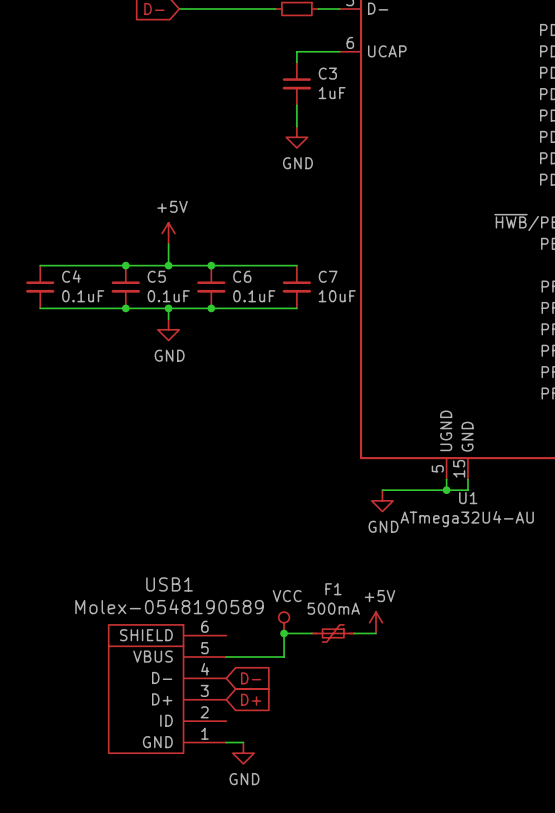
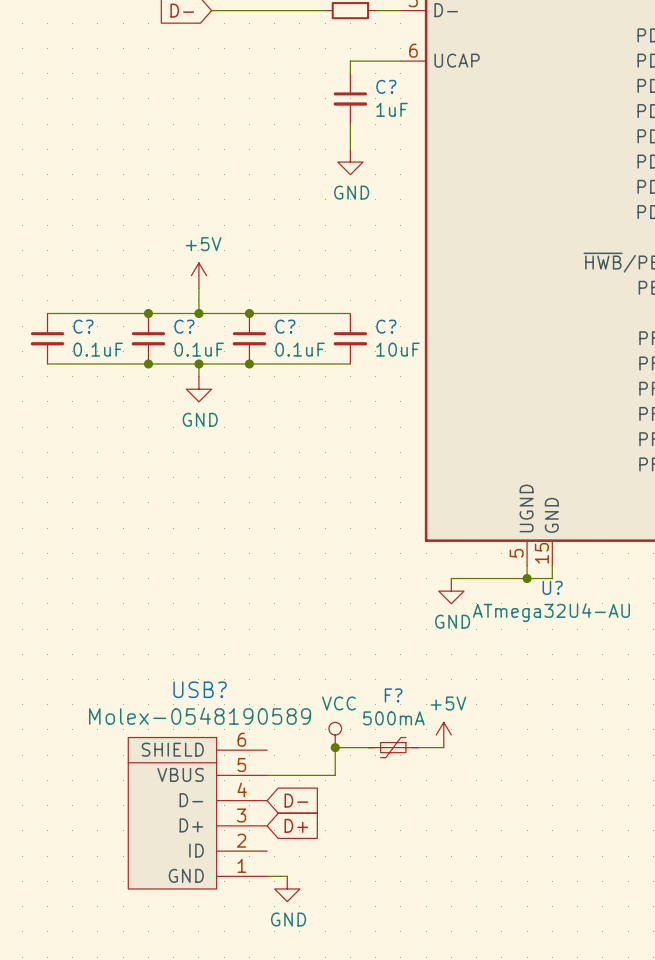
C3 name: C3 (327, 73) -> C? (386, 86)
C4 name: C4 (71, 276) -> C? (83, 326)
C5 name: C5 (156, 276) -> C? (184, 326)
C6 name: C6 (242, 276) -> C? (285, 326)
C7 name: C7 (328, 276) -> C? (386, 326)
U1 name: U1 (468, 498) -> U? (552, 587)
USB1 name: USB1 (169, 584) -> USB? (200, 689)
F1 name: F1 (333, 589) -> F? (393, 695)

